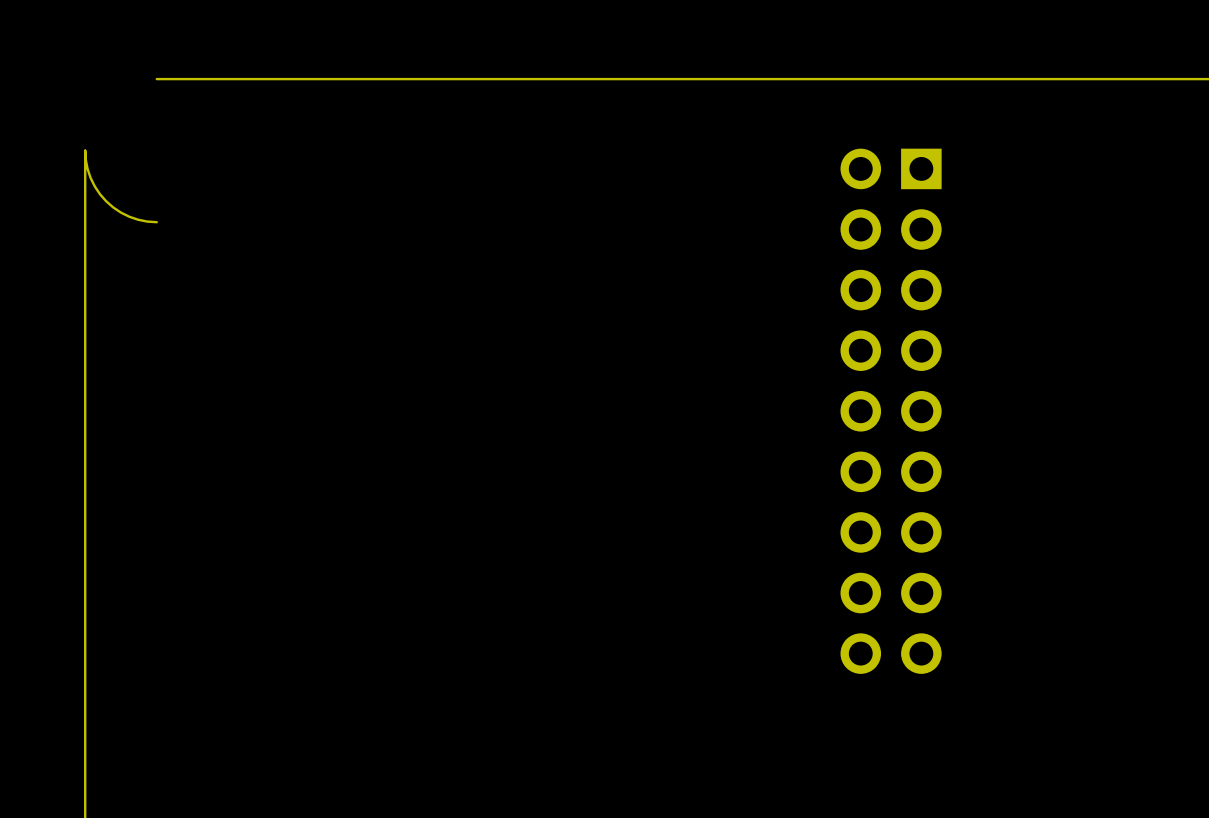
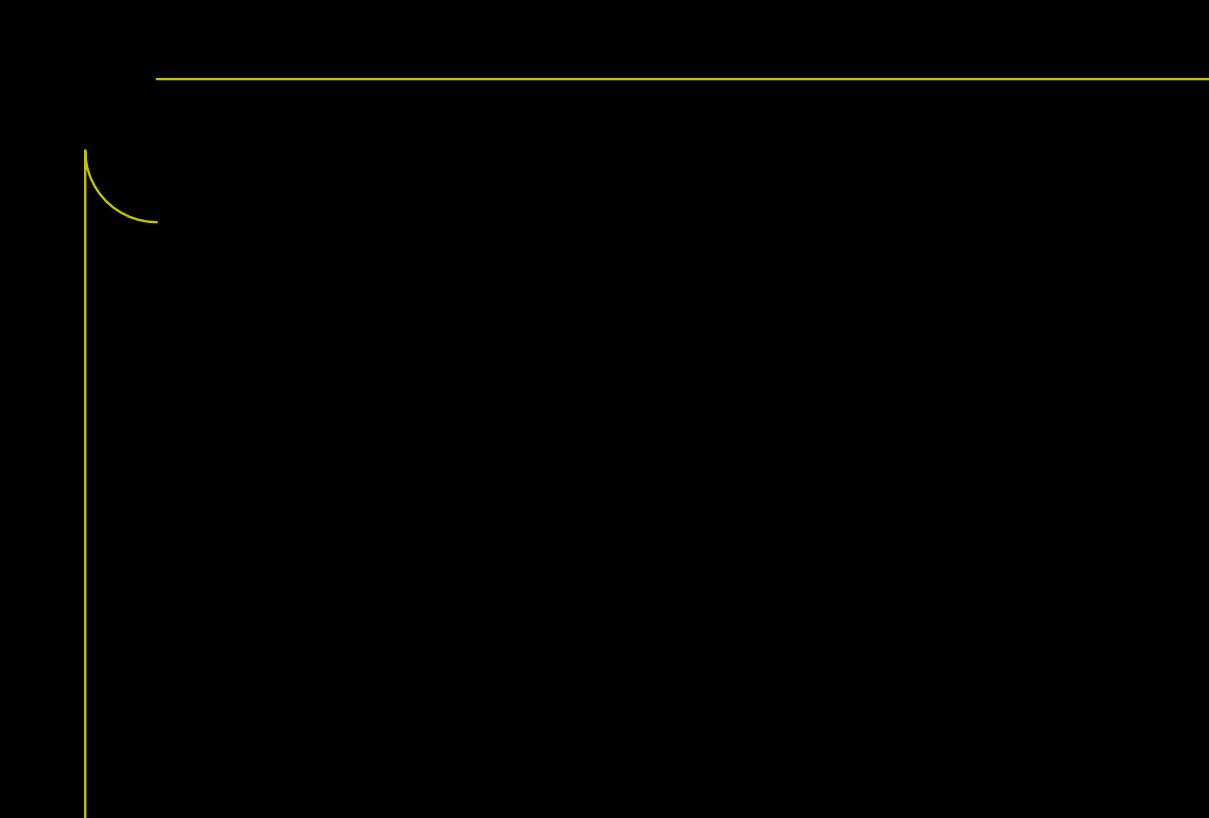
part: (891, 411) -> none

